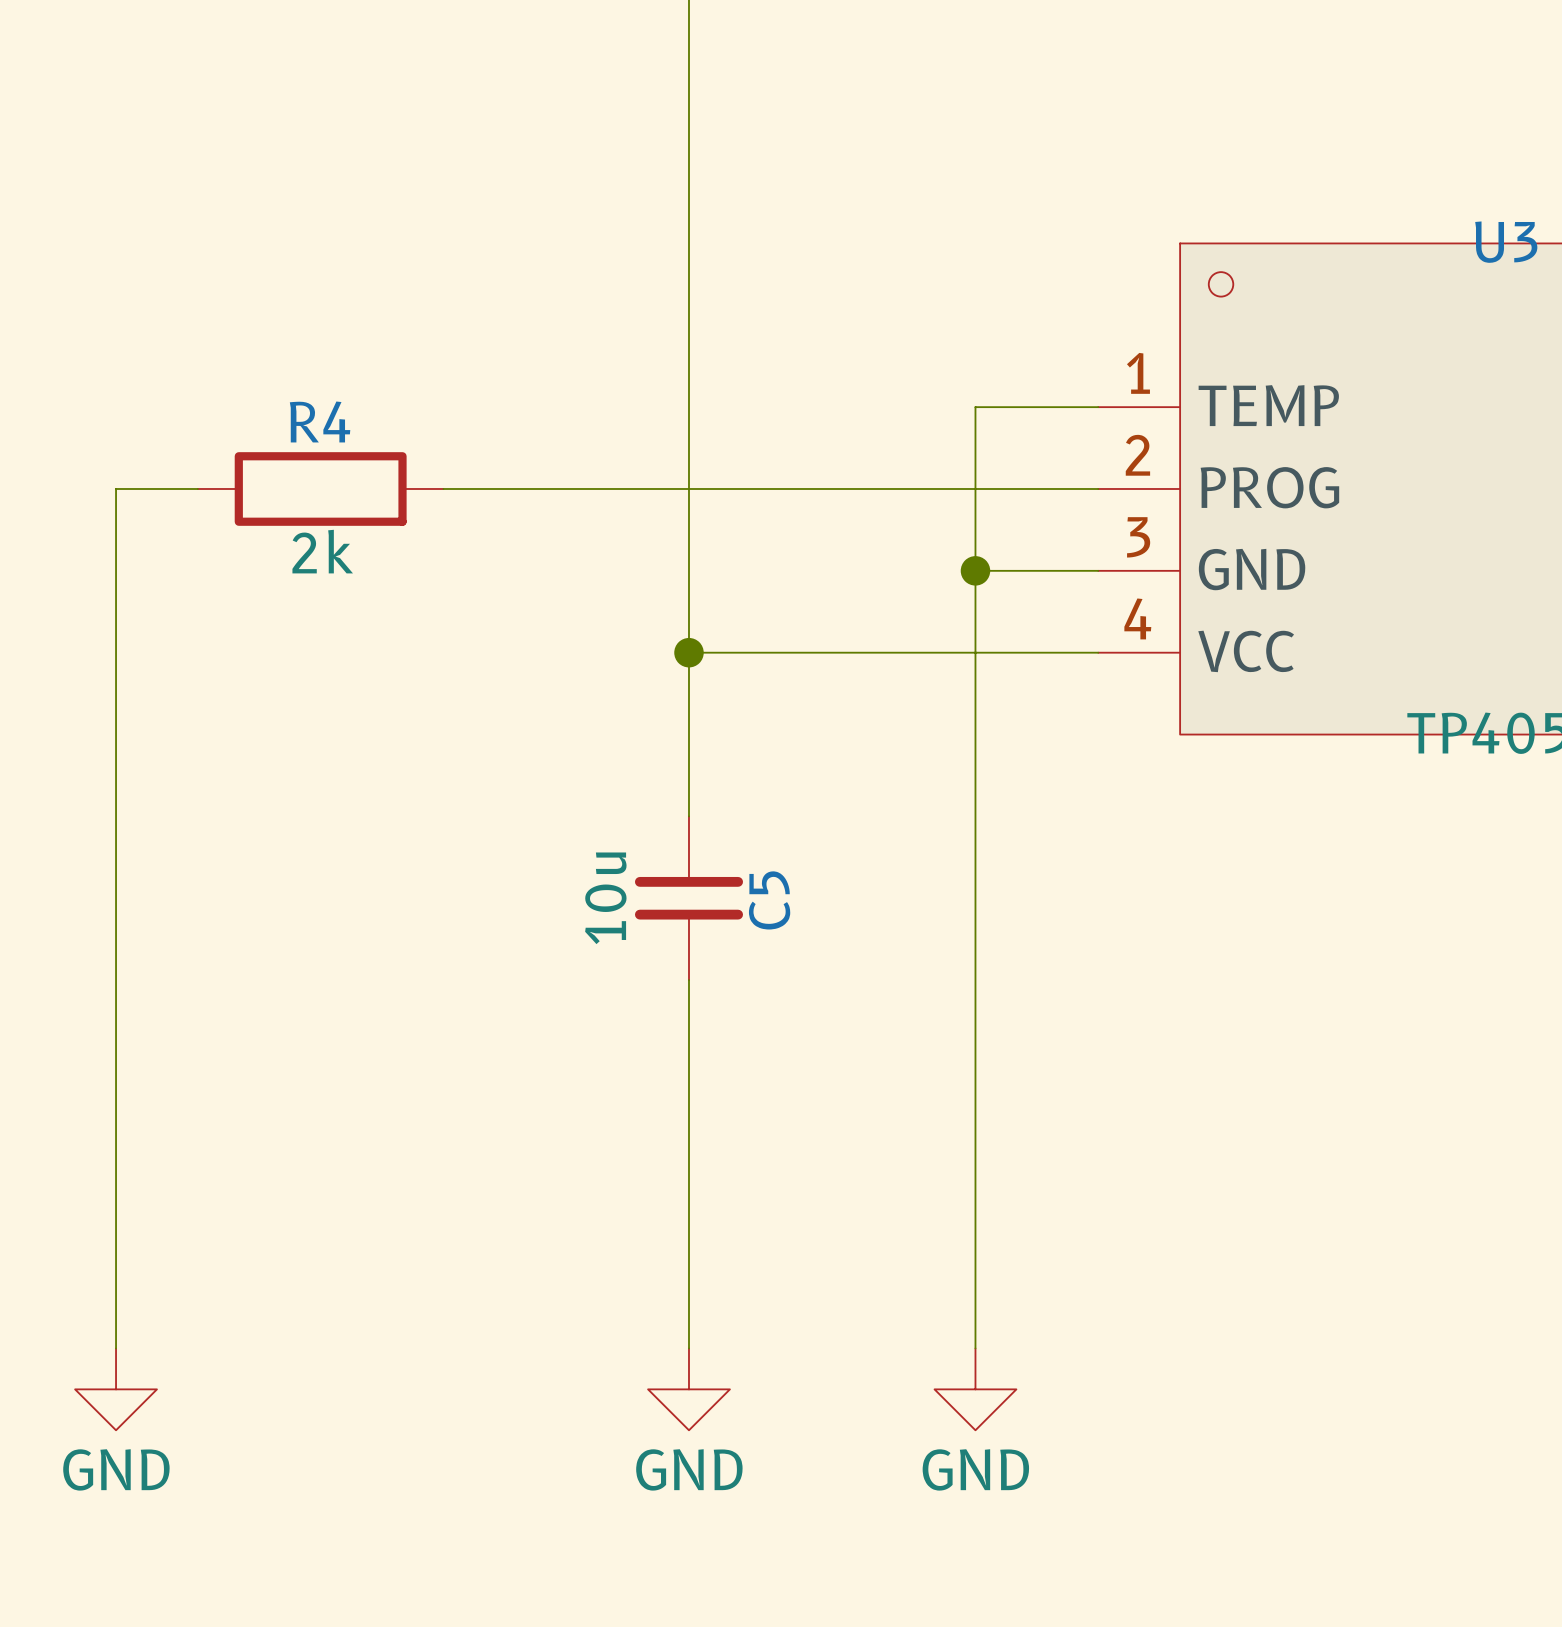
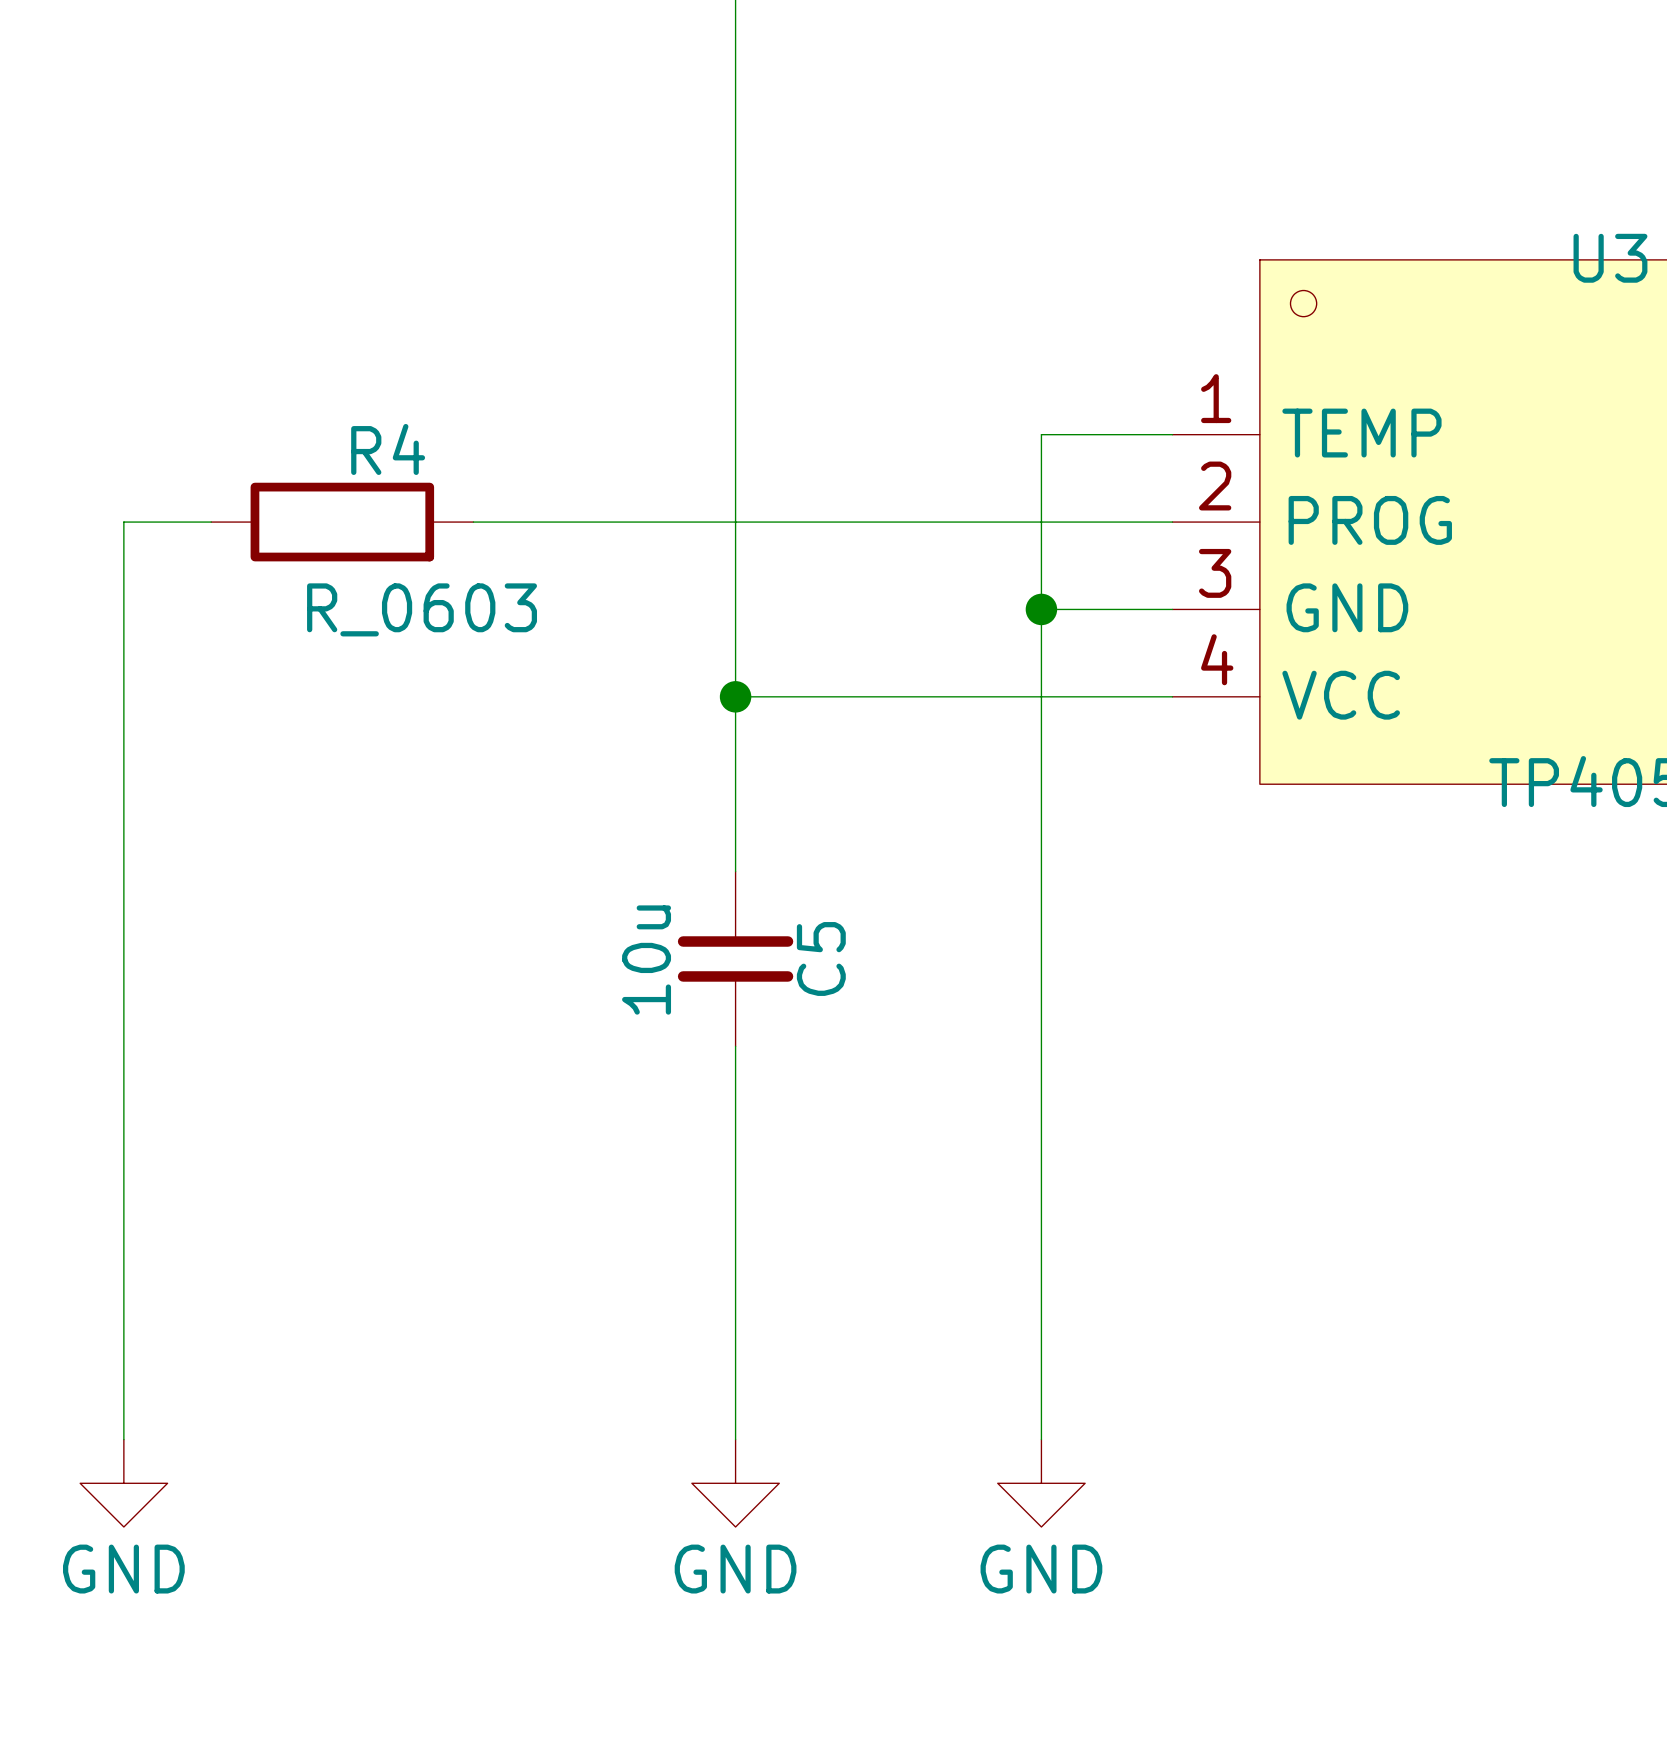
R4 name position: R4 (320, 421) -> R4 (388, 449)
R4 value: 2k (322, 551) -> R_0603 (422, 609)

